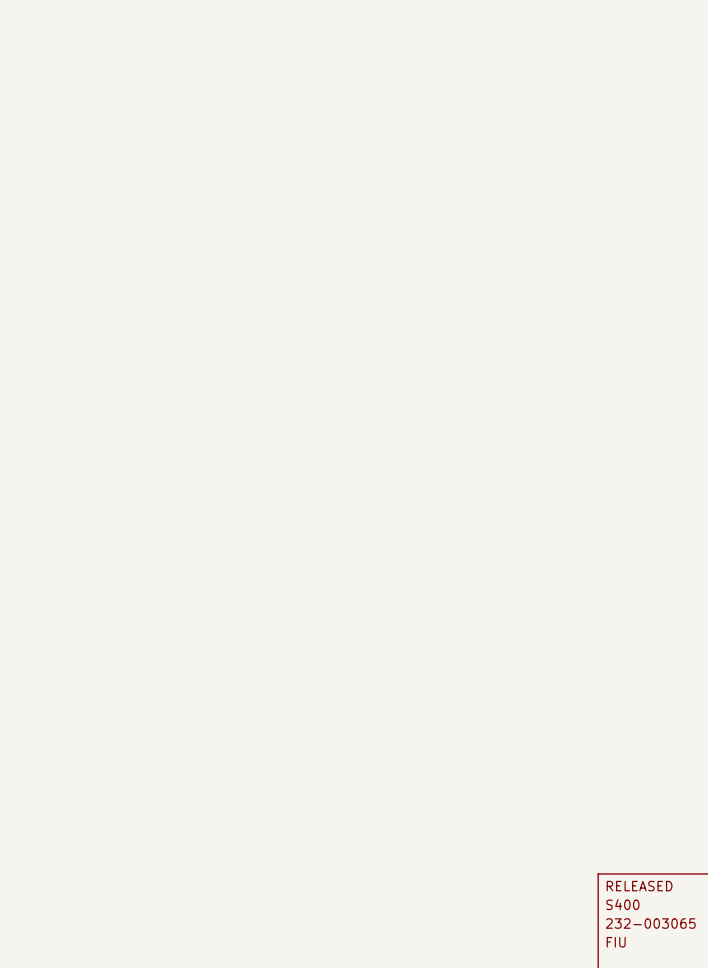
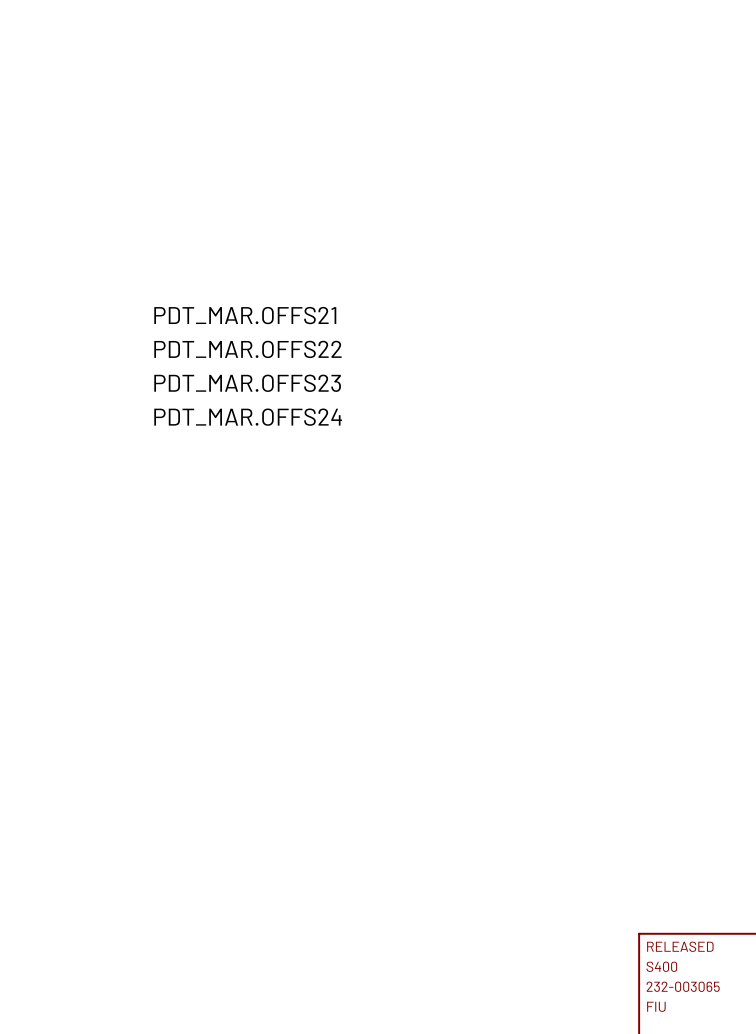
label: none -> PDT_MAR.OFFS21 (245, 315)
label: none -> PDT_MAR.OFFS22 (247, 349)
label: none -> PDT_MAR.OFFS23 (247, 383)
label: none -> PDT_MAR.OFFS24 (248, 417)

